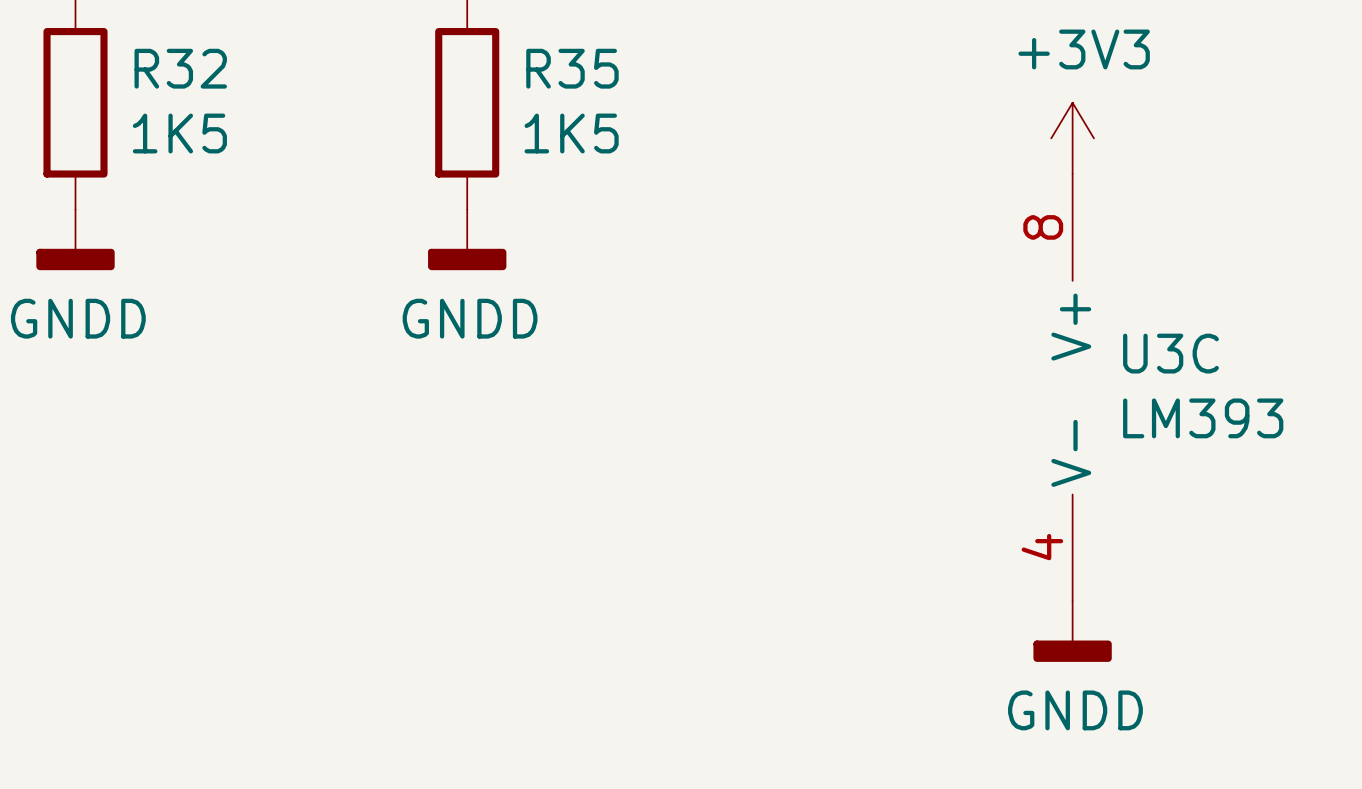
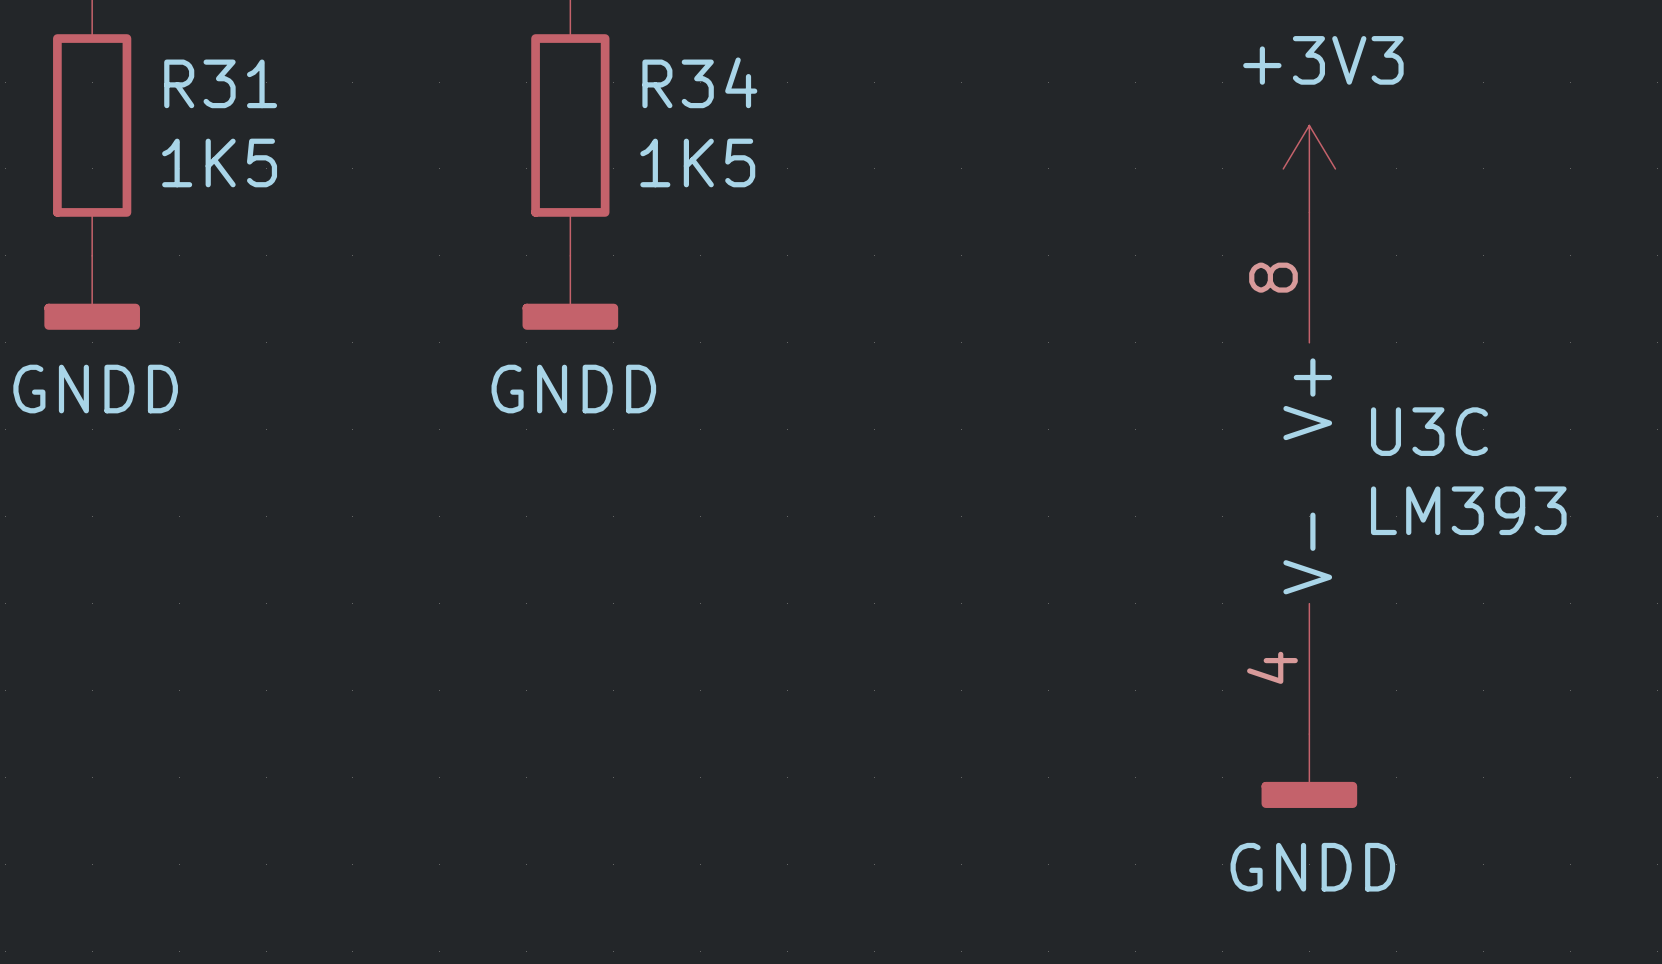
R32 name: R32 (180, 68) -> R31 (220, 83)
R35 name: R35 (572, 68) -> R34 (699, 82)

